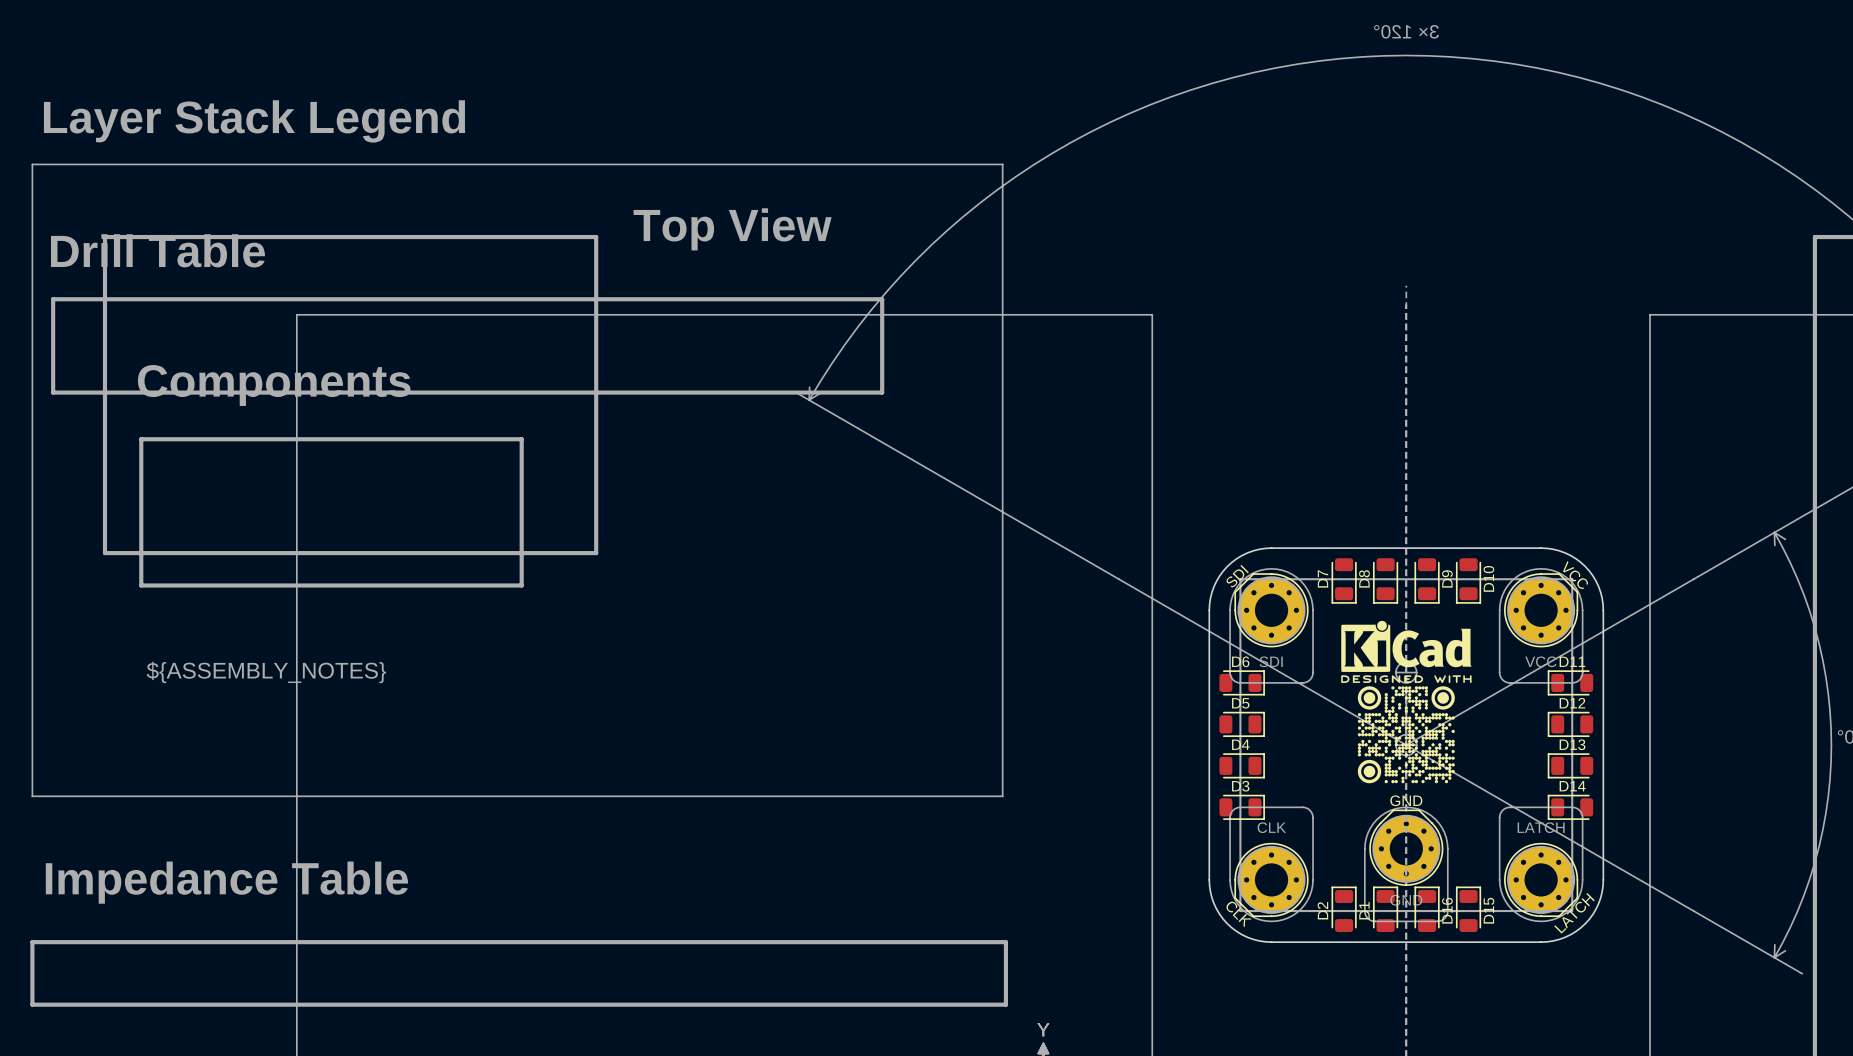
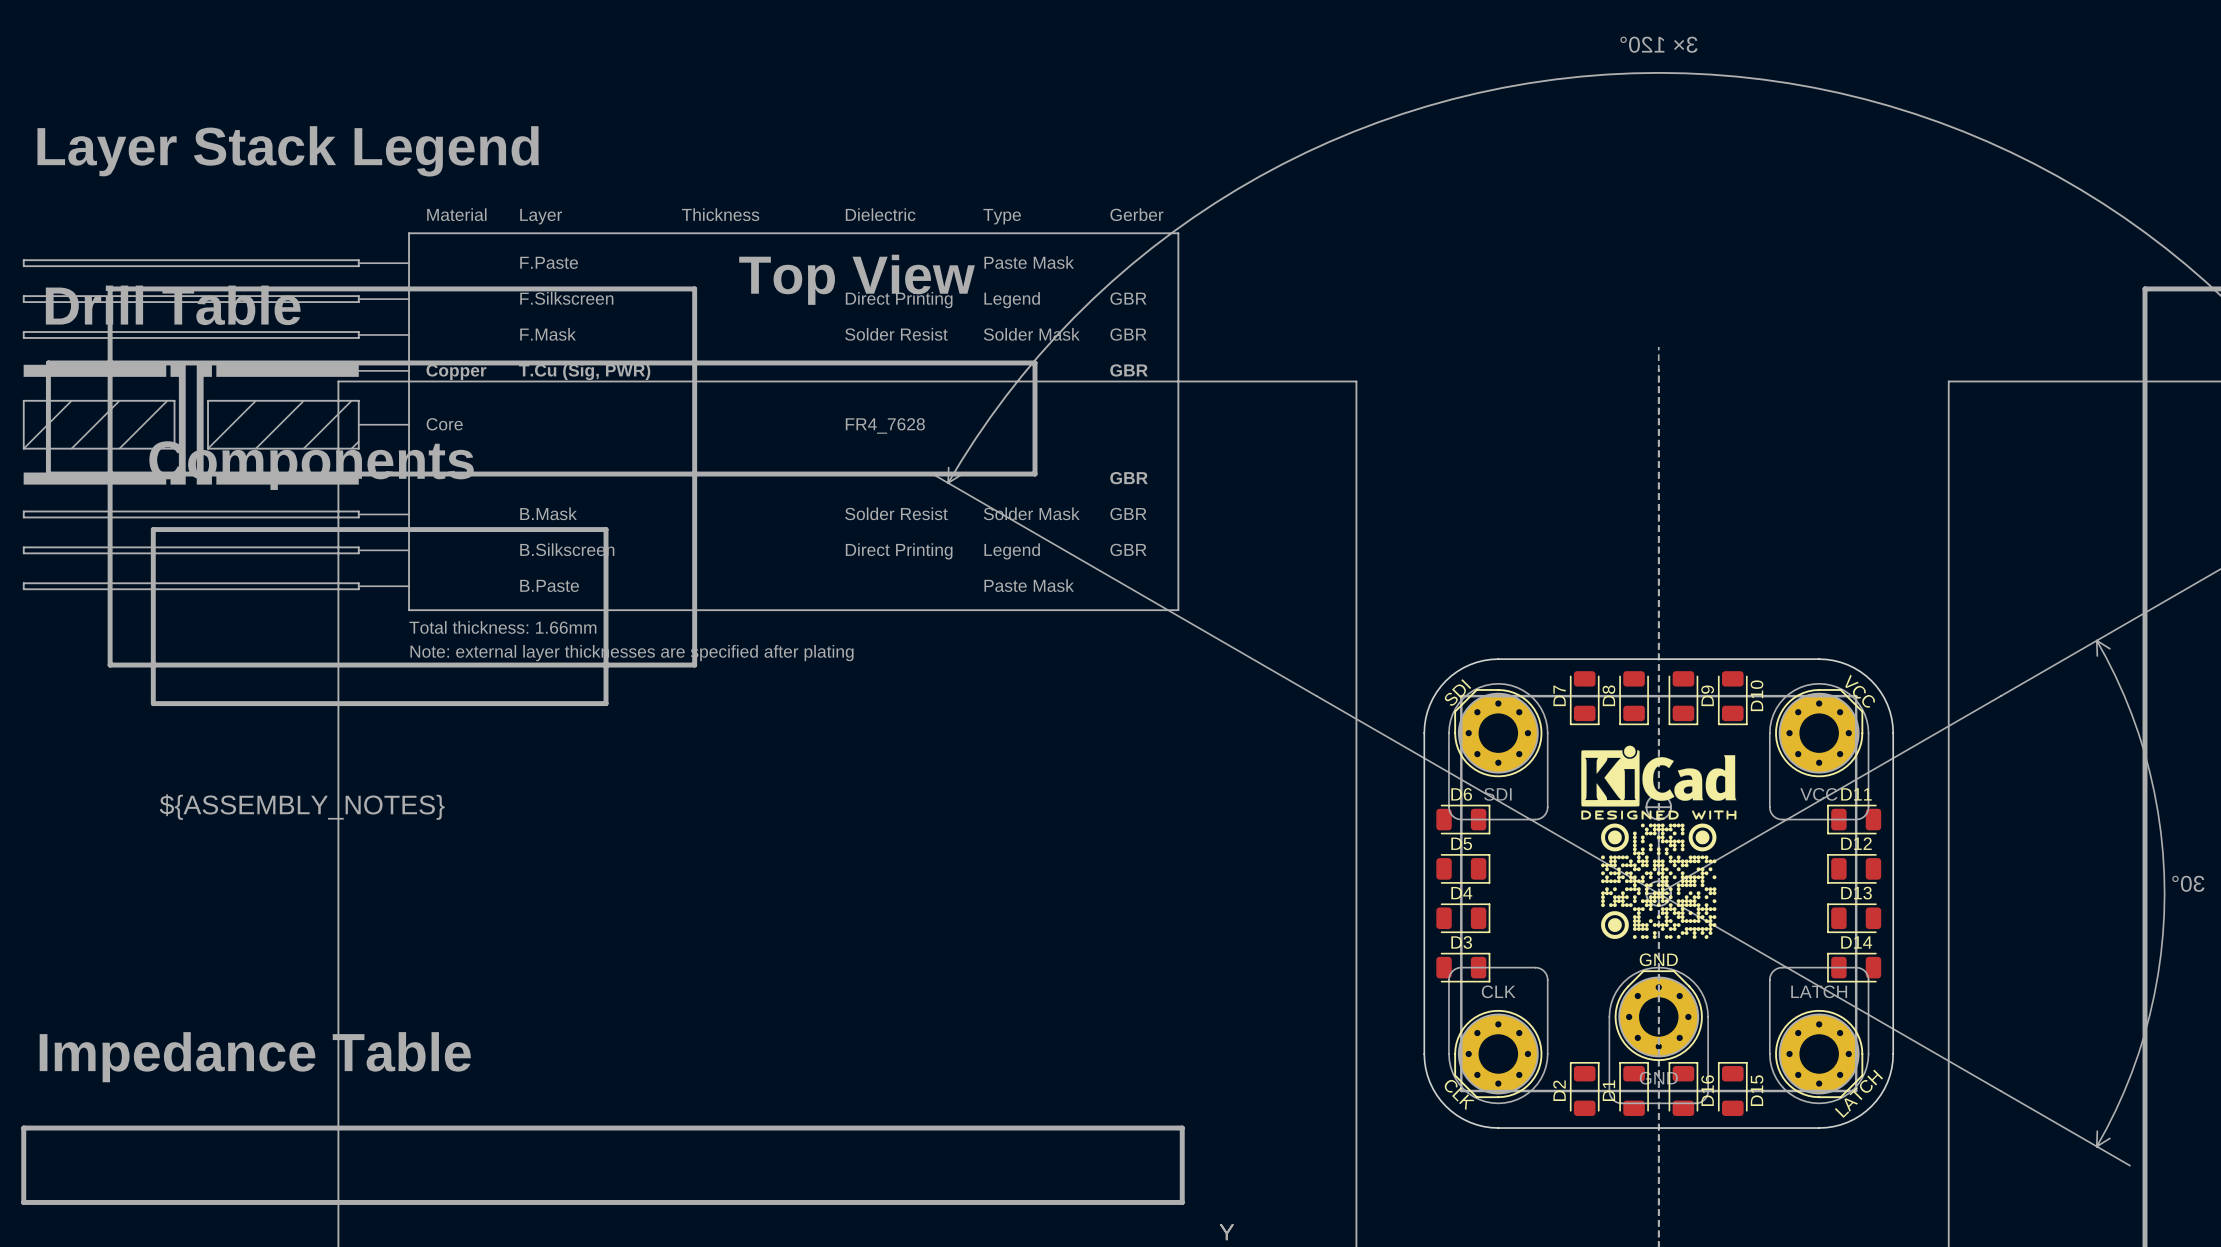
text: none -> Material (456, 214)
text: none -> Thickness (720, 214)
text: none -> Dielectric (880, 214)
text: none -> Gerber (1136, 214)
text: none -> Layer (541, 216)
text: none -> Type (1002, 216)
line: (1002, 190) (1002, 164) (32, 164) (32, 212) -> (1178, 233) (409, 233) (409, 610) (1178, 610)
text: none -> Paste Mask (1029, 262)
line: none -> (358, 263) (409, 263)
text: none -> F.Paste (549, 262)
line: (32, 217) (32, 243) -> (23, 266) (358, 266) (358, 260) (23, 260)
line: none -> (358, 299) (409, 299)
text: none -> F.Silkscreen (566, 298)
text: none -> GBR (1128, 298)
text: none -> Direct Printing (899, 300)
text: none -> Legend (1012, 300)
line: (32, 248) (32, 273) -> (23, 302) (358, 302) (358, 296) (23, 296)
line: none -> (358, 334) (409, 334)
text: none -> F.Mask (548, 334)
text: none -> Solder Resist (896, 334)
text: none -> Solder Mask (1031, 334)
text: none -> GBR (1128, 334)
line: (32, 278) (32, 331) -> (23, 337) (358, 337) (358, 331) (23, 331)
drawing: none -> [23, 364, 359, 485]
line: none -> (358, 370) (409, 370)
text: none -> GBR (1129, 370)
text: none -> Copper (456, 372)
text: none -> T.Cu (Sig, PWR) (584, 371)
line: none -> (23, 400) (174, 400) (174, 448) (23, 448) (71, 400)
line: none -> (119, 400) (71, 448)
line: none -> (167, 400) (119, 448)
line: none -> (255, 400) (208, 448)
line: none -> (303, 400) (255, 448)
line: none -> (351, 400) (303, 448)
text: none -> Core (444, 424)
line: none -> (358, 424) (409, 424)
text: none -> FR4_7628 (885, 425)
line: none -> (358, 441) (351, 448)
line: (32, 371) (32, 424) -> none
line: none -> (208, 448) (358, 448) (358, 400) (208, 400) (208, 448)
text: none -> GBR (1129, 478)
text: none -> B.Mask (548, 513)
text: none -> Solder Resist (896, 513)
text: none -> Solder Mask (1031, 513)
line: none -> (358, 514) (409, 514)
text: none -> GBR (1128, 514)
line: (32, 429) (32, 454) -> (23, 517) (358, 517) (358, 511) (23, 511)
line: none -> (23, 547) (358, 547) (358, 553) (23, 553)
line: none -> (358, 550) (409, 550)
text: none -> B.Silkscreen (567, 549)
text: none -> GBR (1128, 549)
text: none -> Direct Printing (899, 551)
text: none -> Legend (1012, 551)
line: (32, 459) (32, 484) -> (23, 589) (358, 589) (358, 583) (23, 583)
line: none -> (358, 586) (409, 586)
text: none -> B.Paste (549, 585)
text: none -> Paste Mask (1029, 585)
line: (32, 489) (32, 796) (1002, 796) (1002, 506) -> none
text: none -> Total thickness: 1.66mm (502, 627)
text: none -> Note: external layer thicknesses are specified after plating (632, 653)

